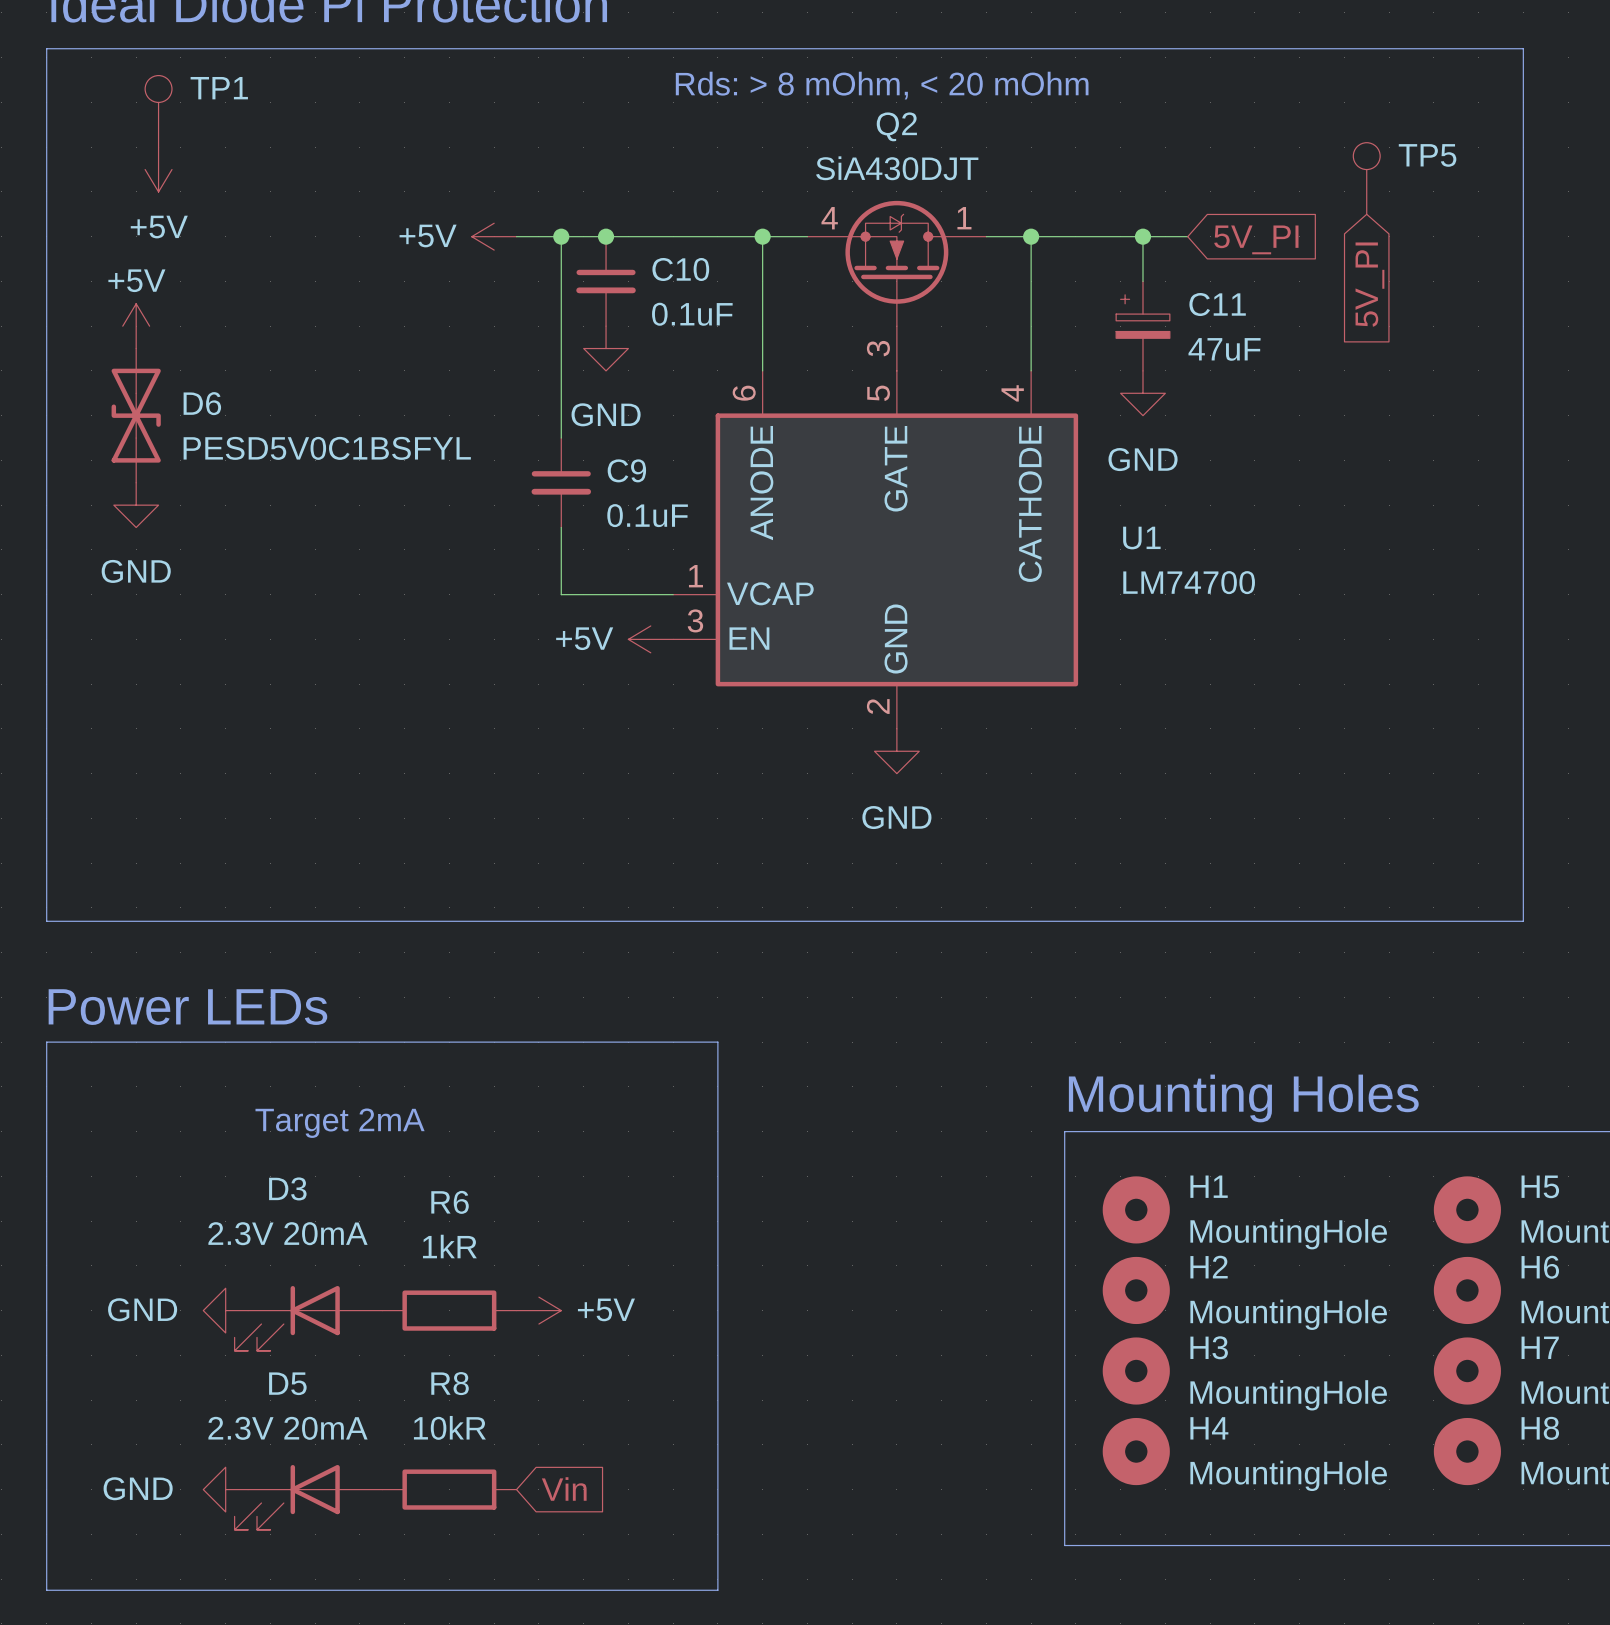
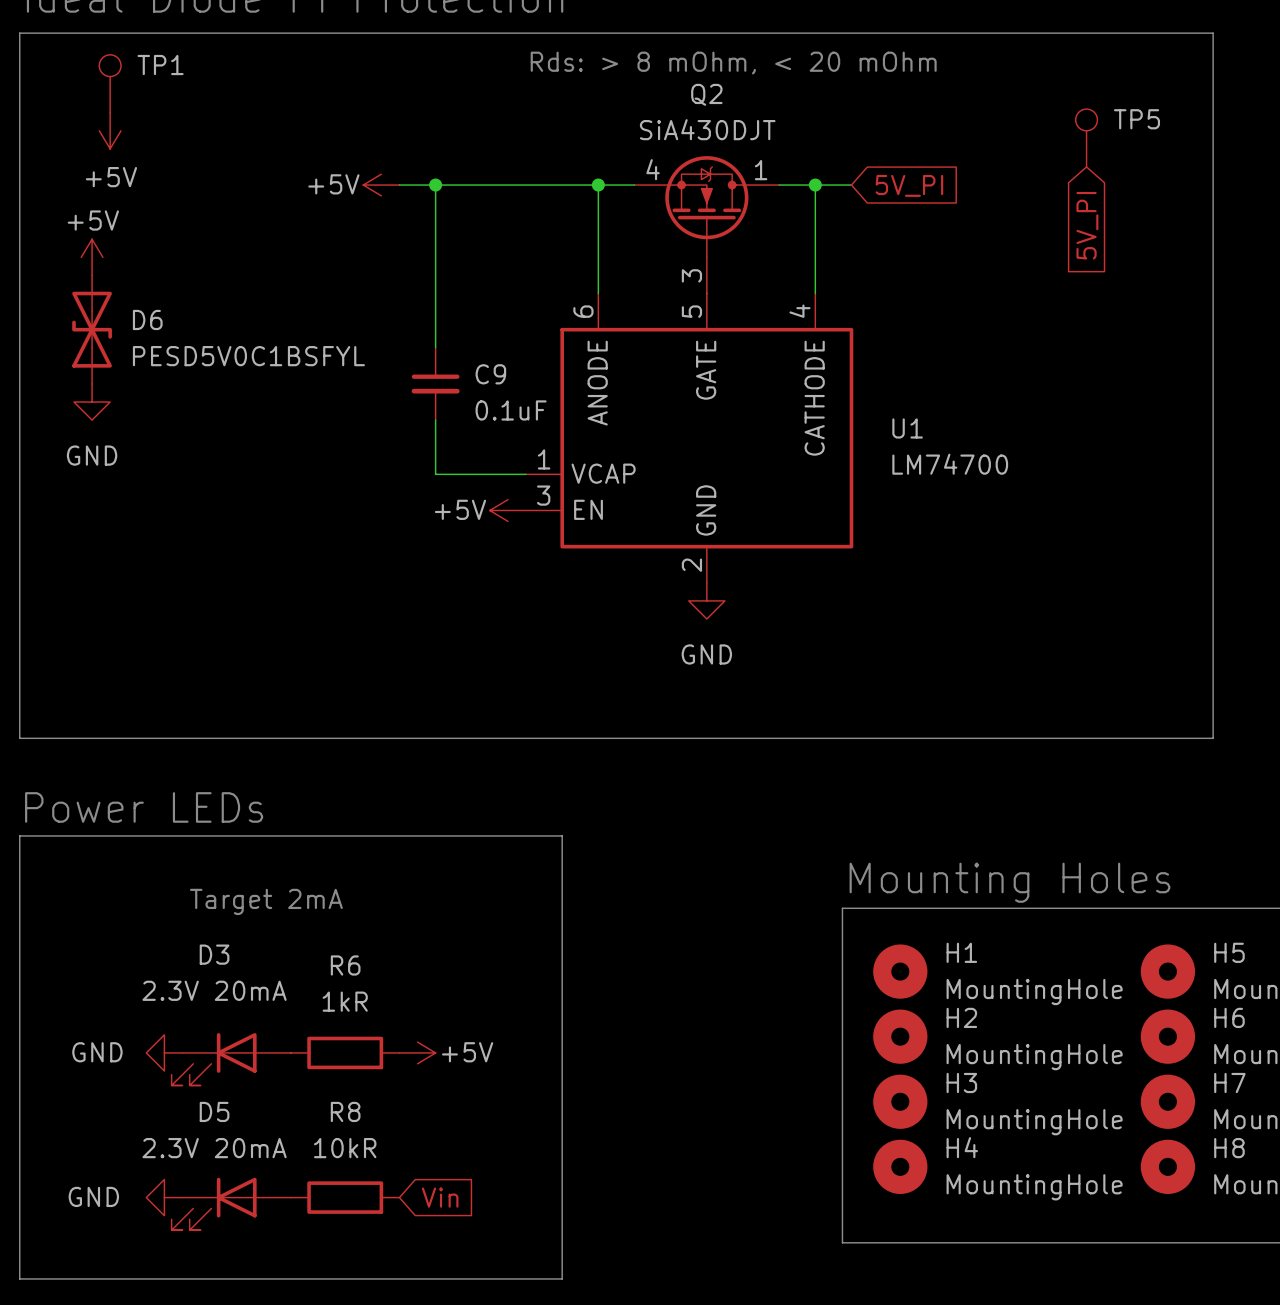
junction: (606, 236) -> none
wire: (1075, 236) (1187, 236) -> none
wire: (1142, 236) (1142, 281) -> none
junction: (1142, 236) -> none
global label position: 5V_PI (1256, 239) -> 5V_PI (909, 185)
C10: 0.1uF (606, 281) -> none
C11: 47uF (1142, 326) -> none
power symbol: GND (606, 348) -> none
power symbol: GND (1142, 393) -> none

